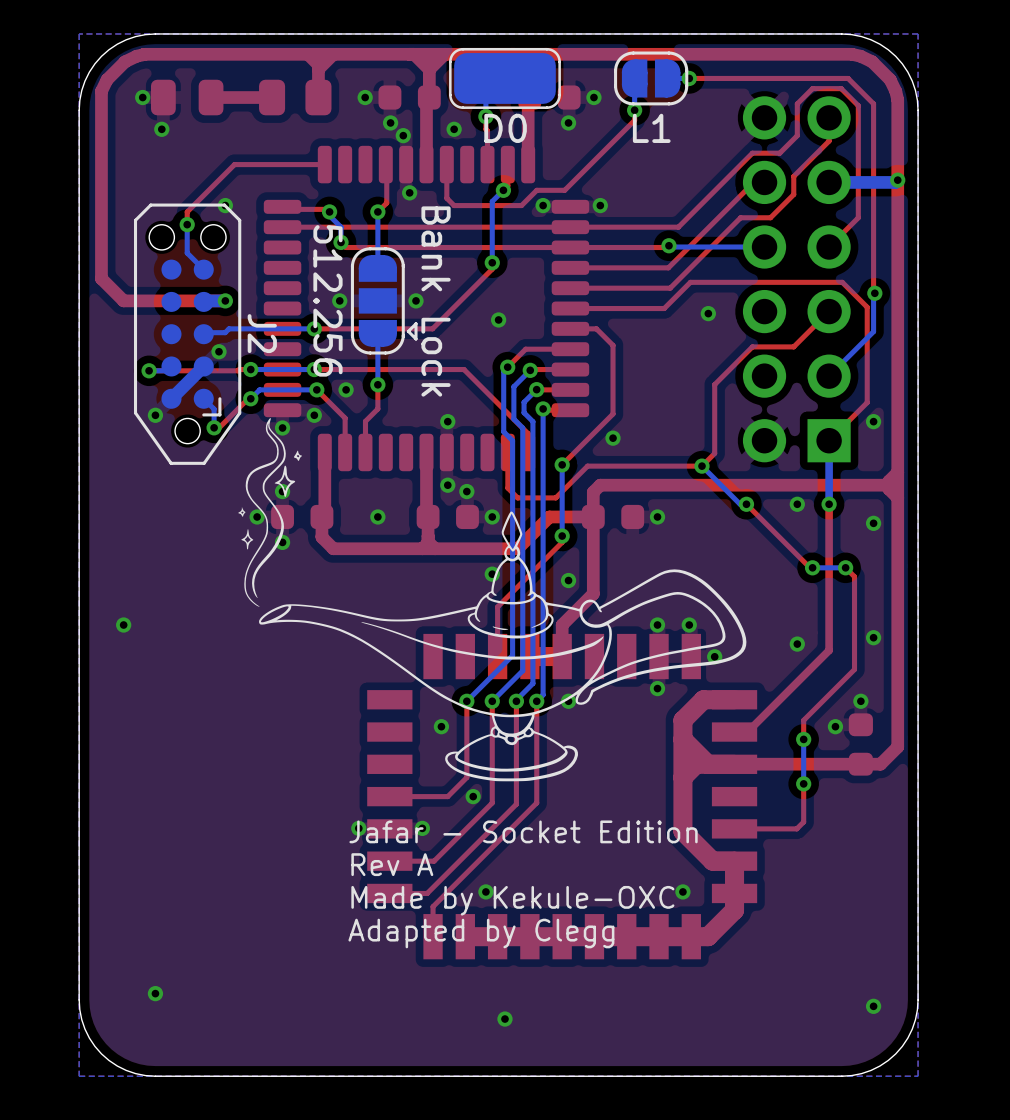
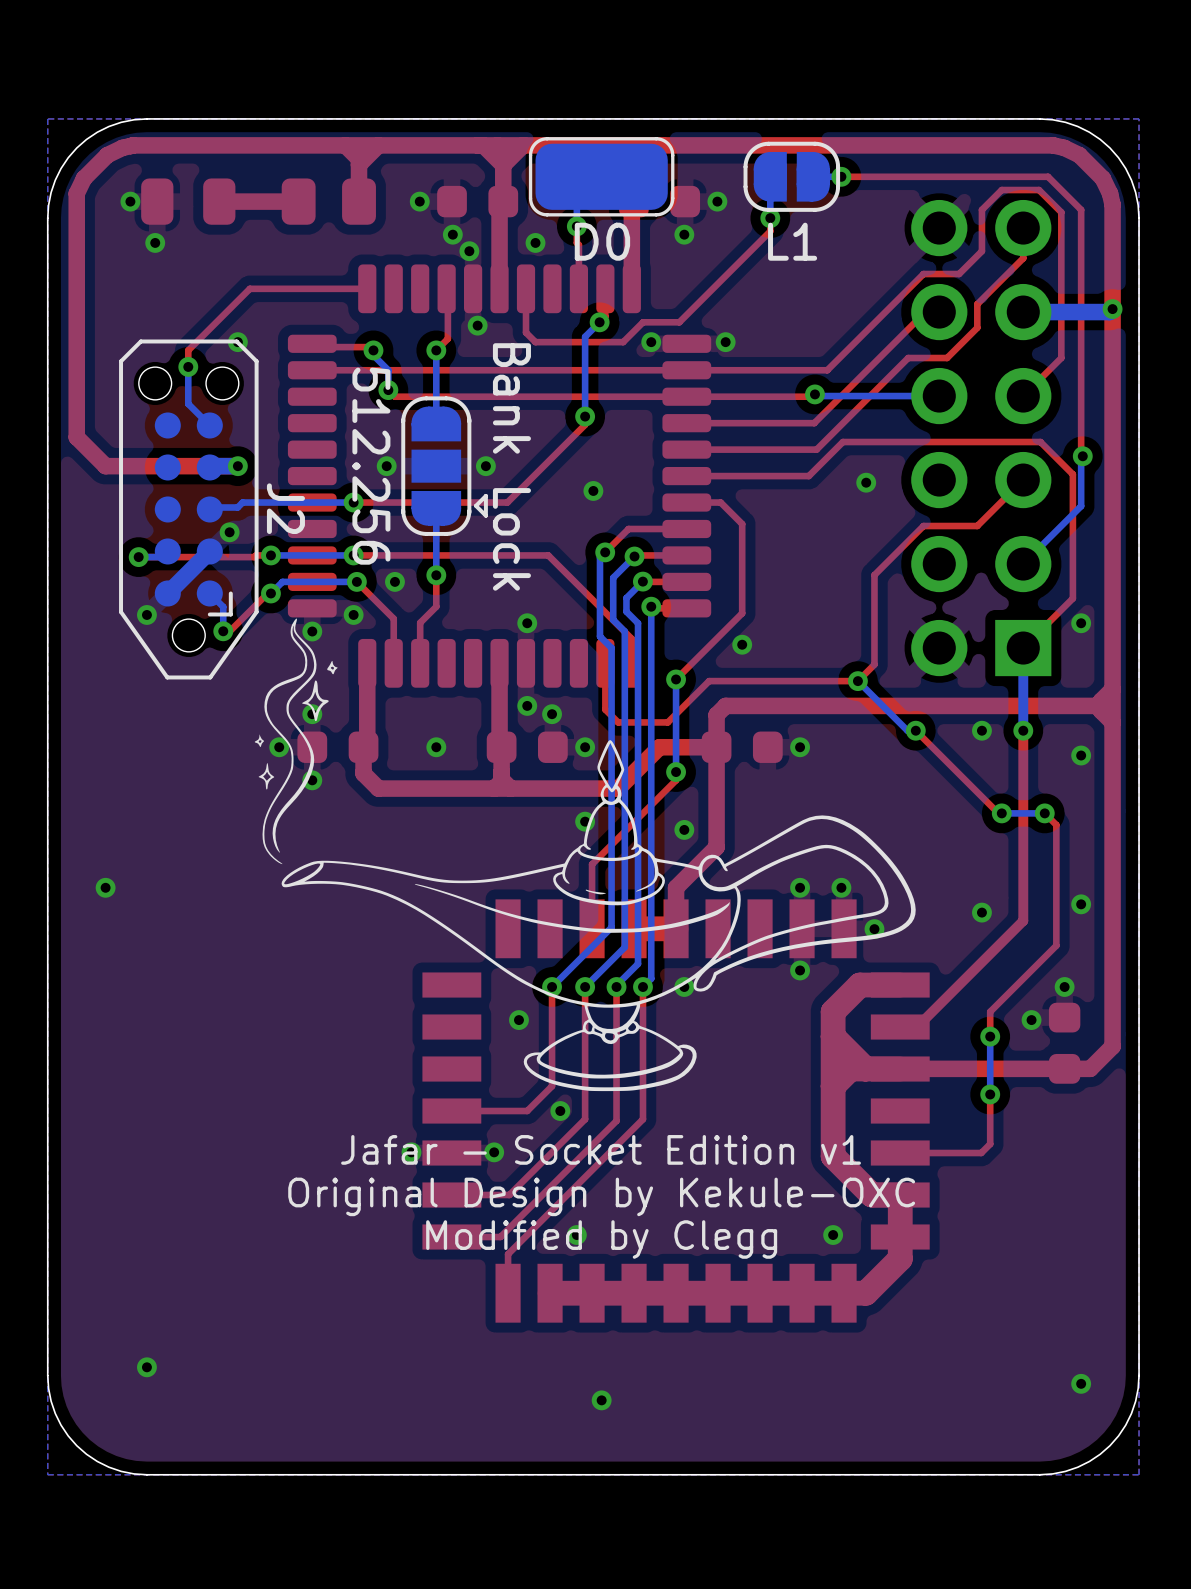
text: Jafar - Socket Edition (523, 831) -> Jafar - Socket Edition v1 (601, 1149)
text: Rev A (392, 864) -> none
text: Made by Kekule-OXC (512, 900) -> Original Design by Kekule-OXC (601, 1196)
text: Adapted by Clegg (481, 933) -> Modified by Clegg (601, 1239)

